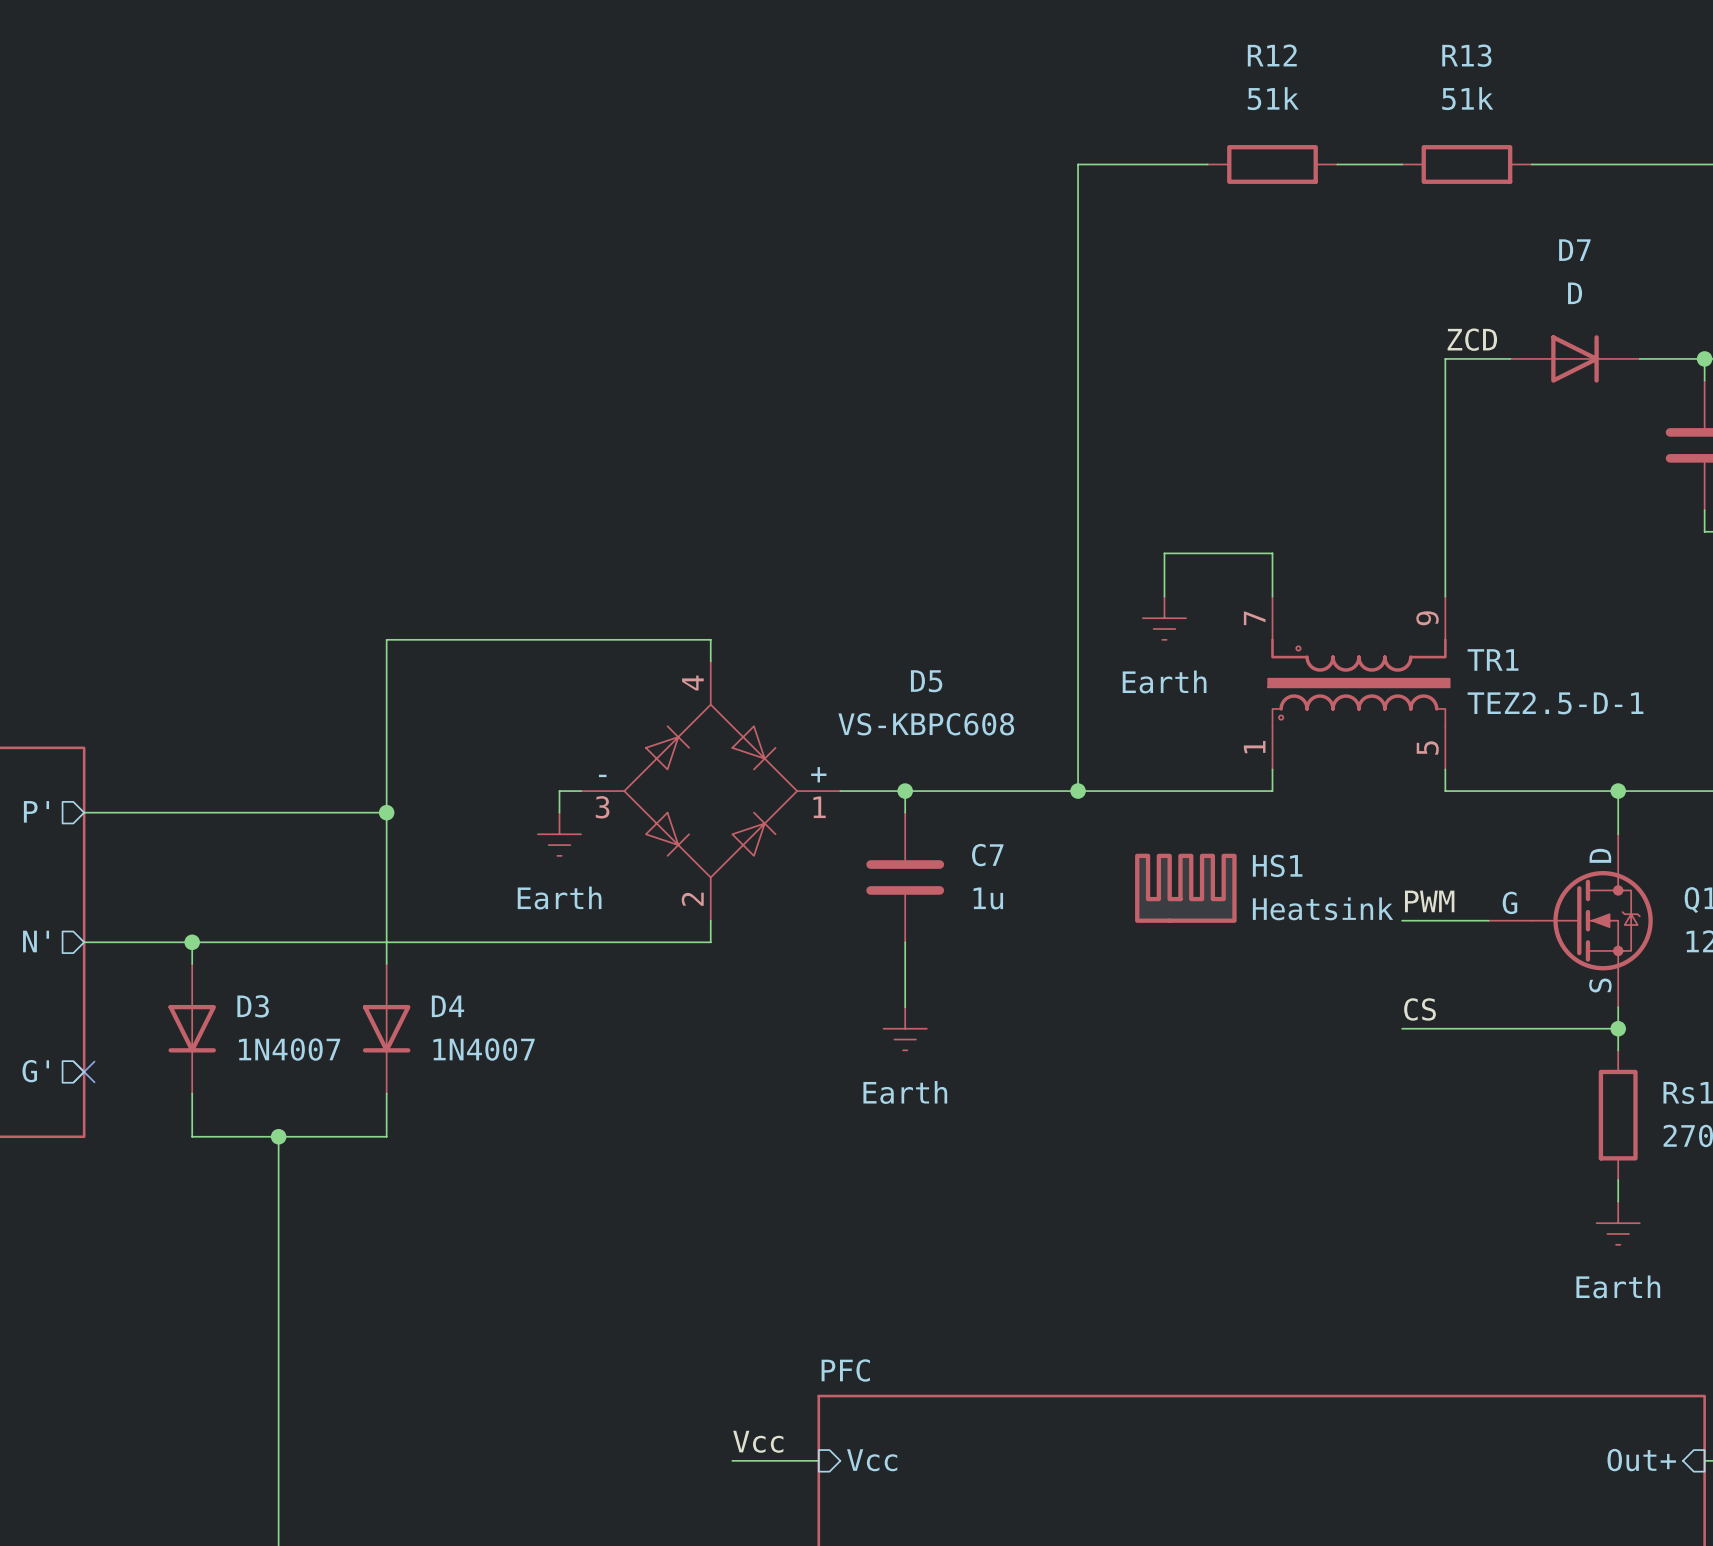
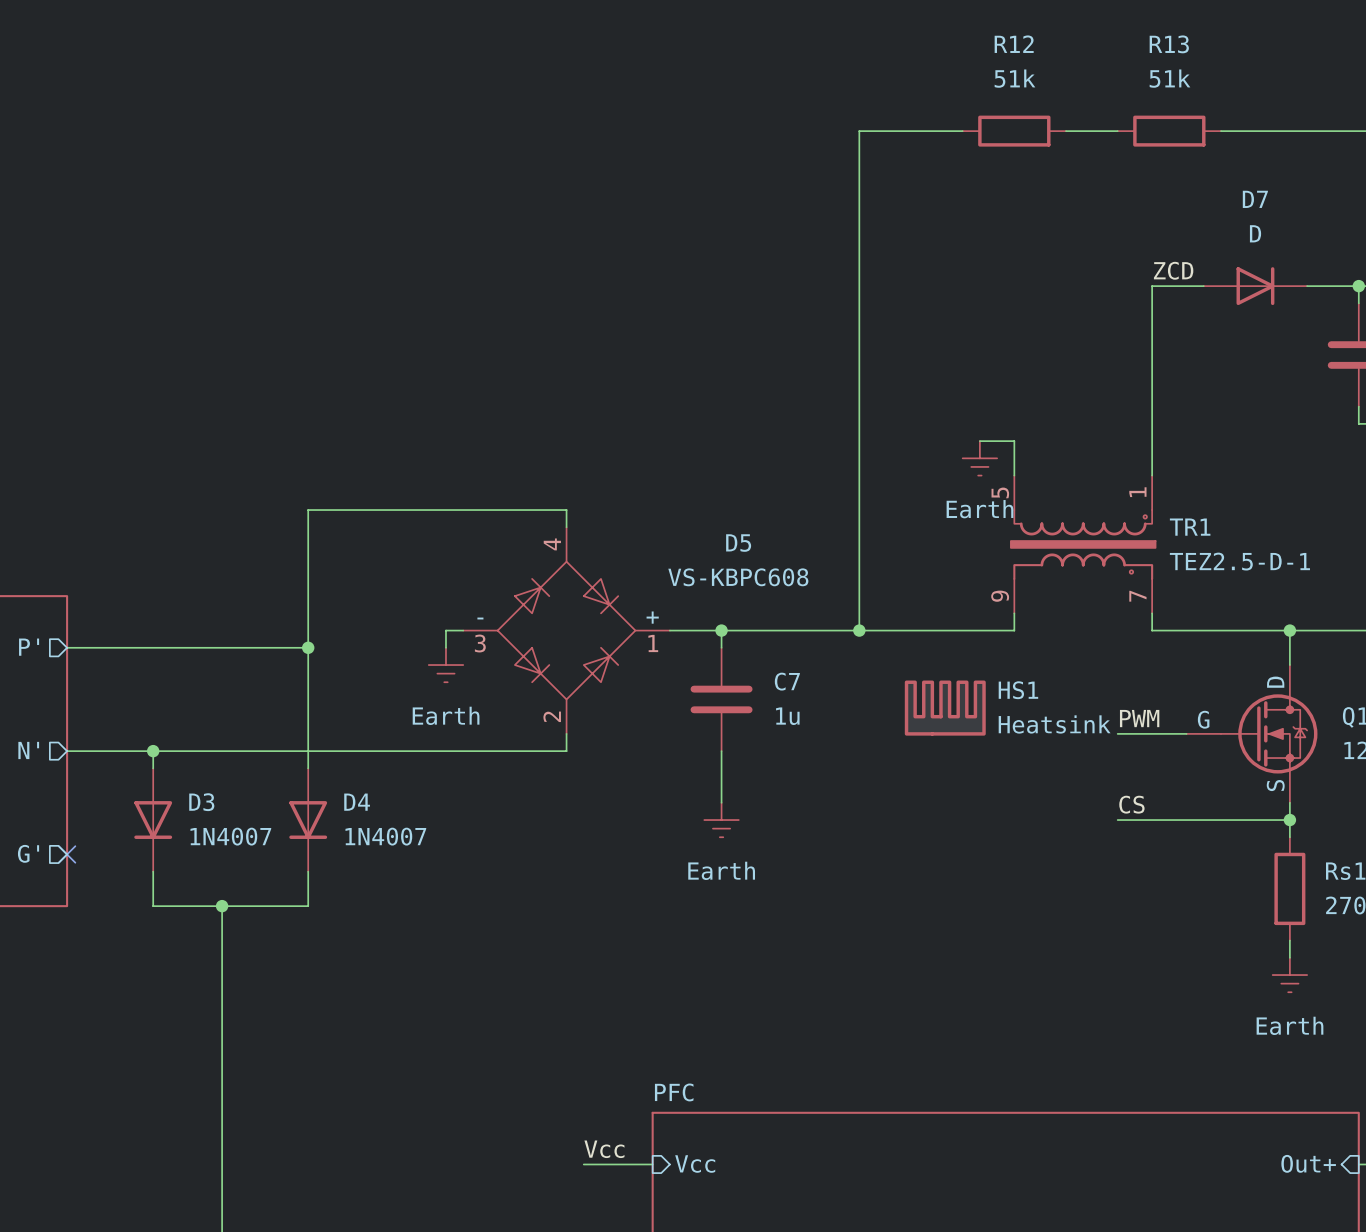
wire: (1229, 553) (1164, 553) (1164, 596) -> none
power symbol position: Earth (1164, 618) -> Earth (979, 458)
TR1 rotation: 0° (1358, 682) -> 180° (1083, 544)

